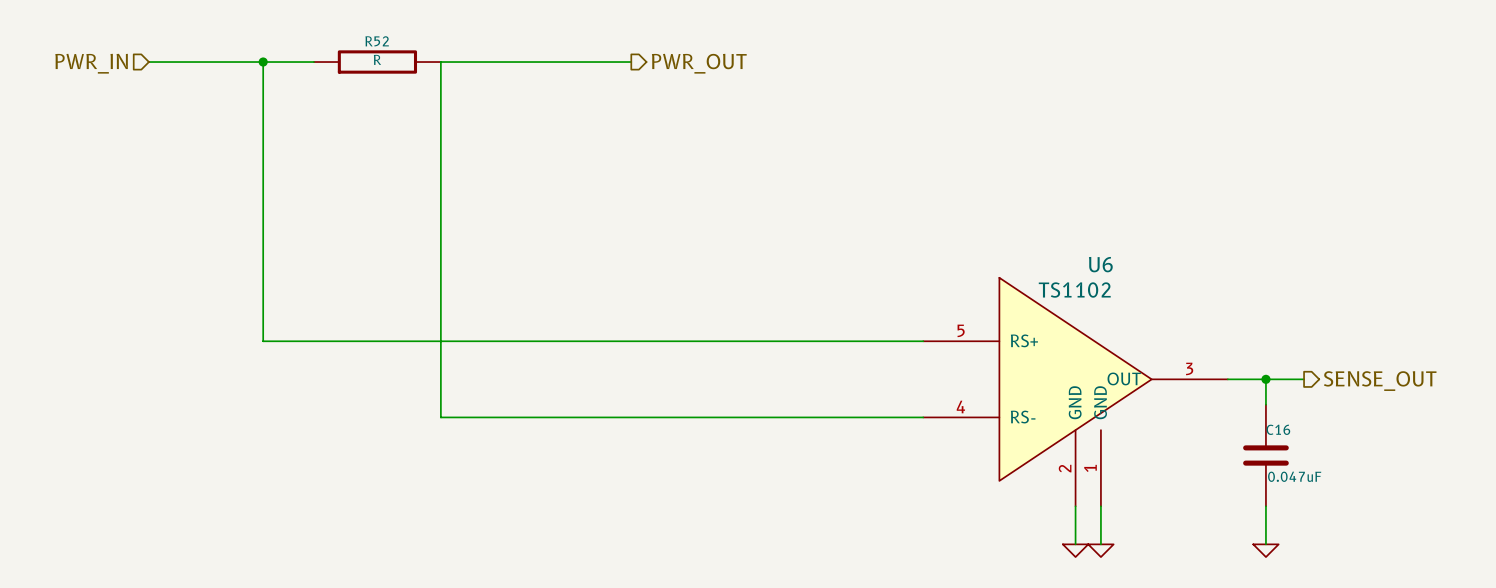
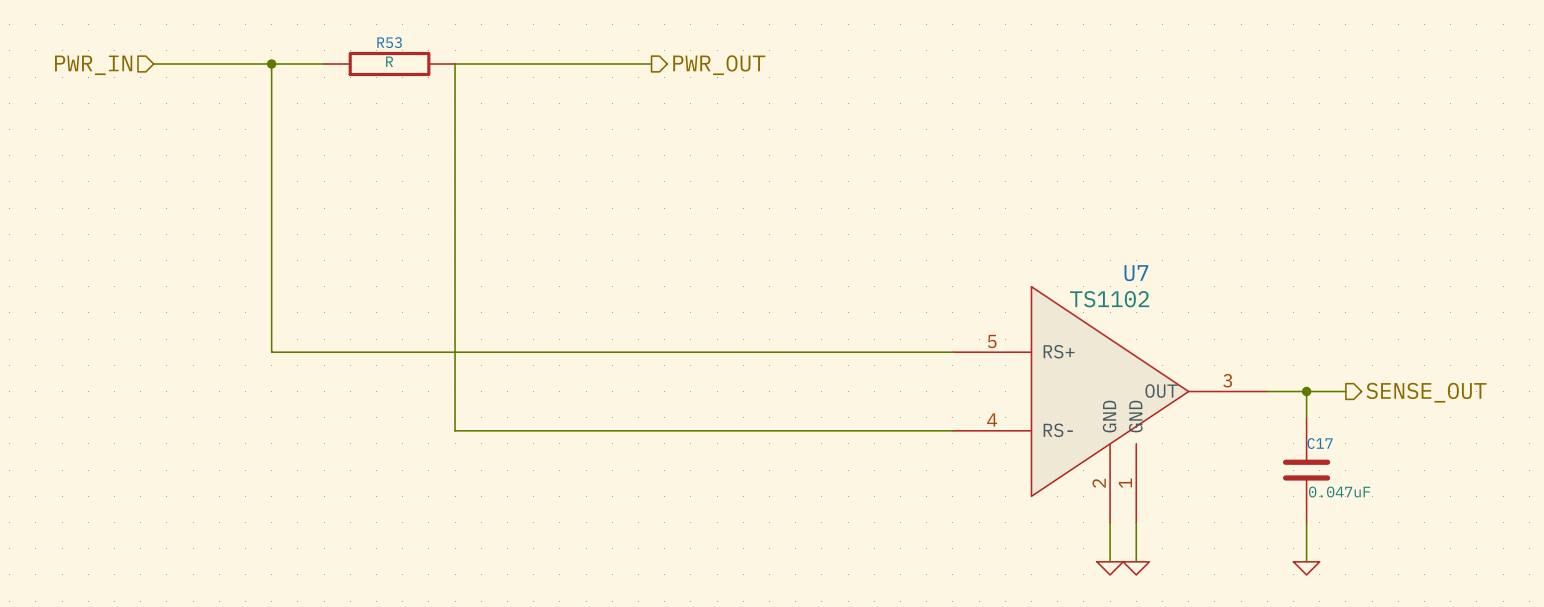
R52 name: R52 (377, 41) -> R53 (389, 42)
U6 name: U6 (1100, 264) -> U7 (1136, 273)
C16 name: C16 (1278, 429) -> C17 (1320, 443)

